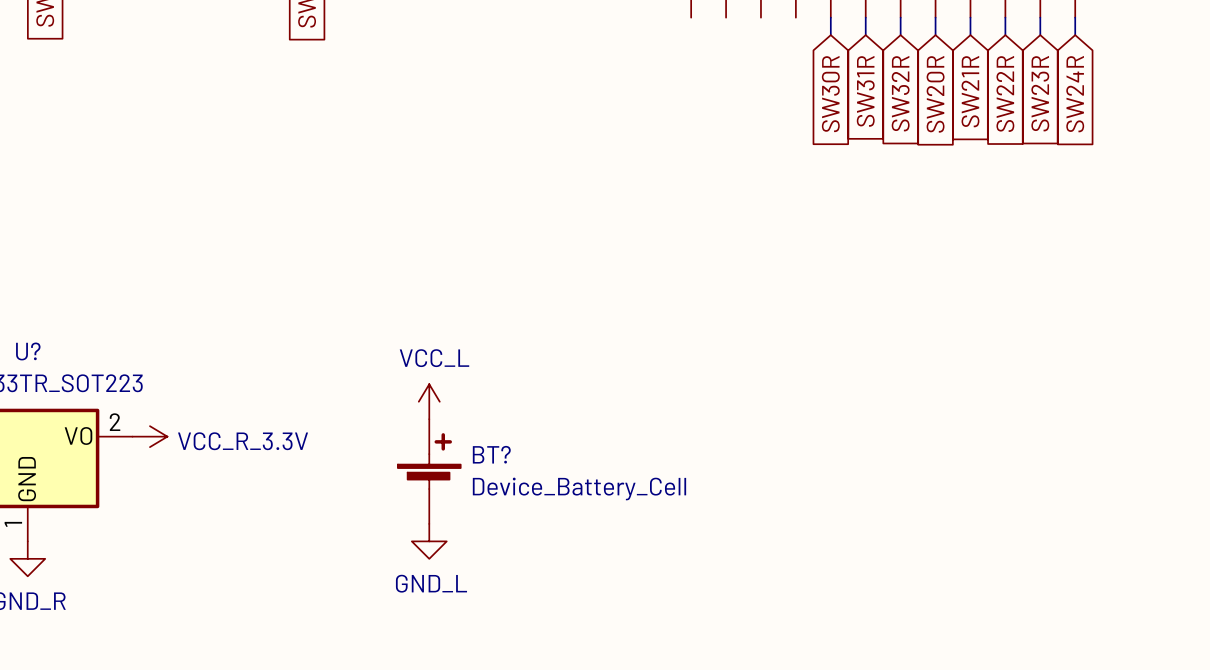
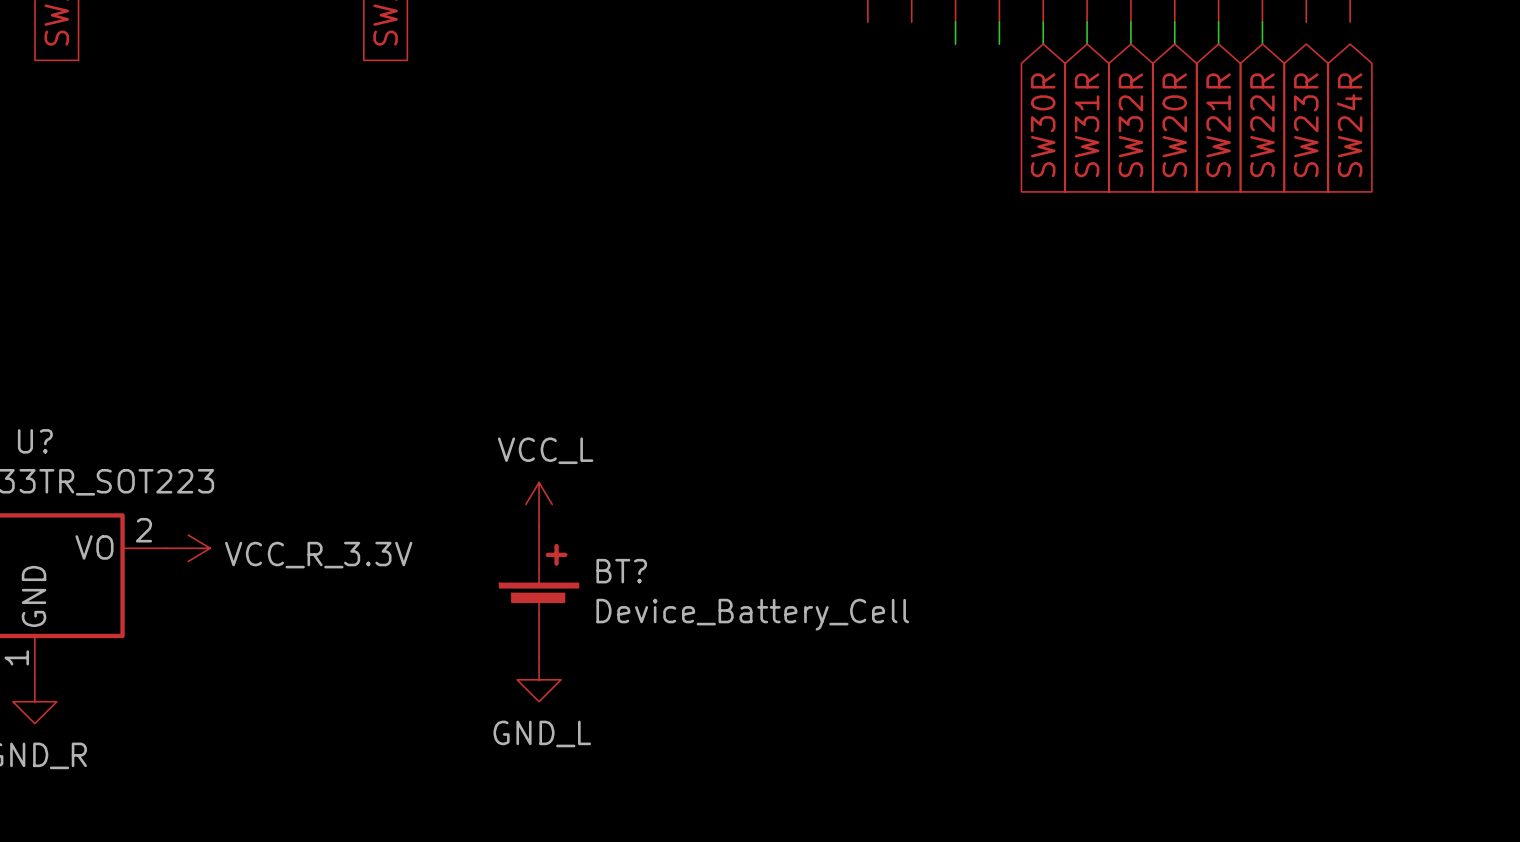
wire: (1040, 17) (1040, 35) -> (955, 22) (955, 44)
wire: (1075, 17) (1075, 35) -> (999, 22) (999, 44)

